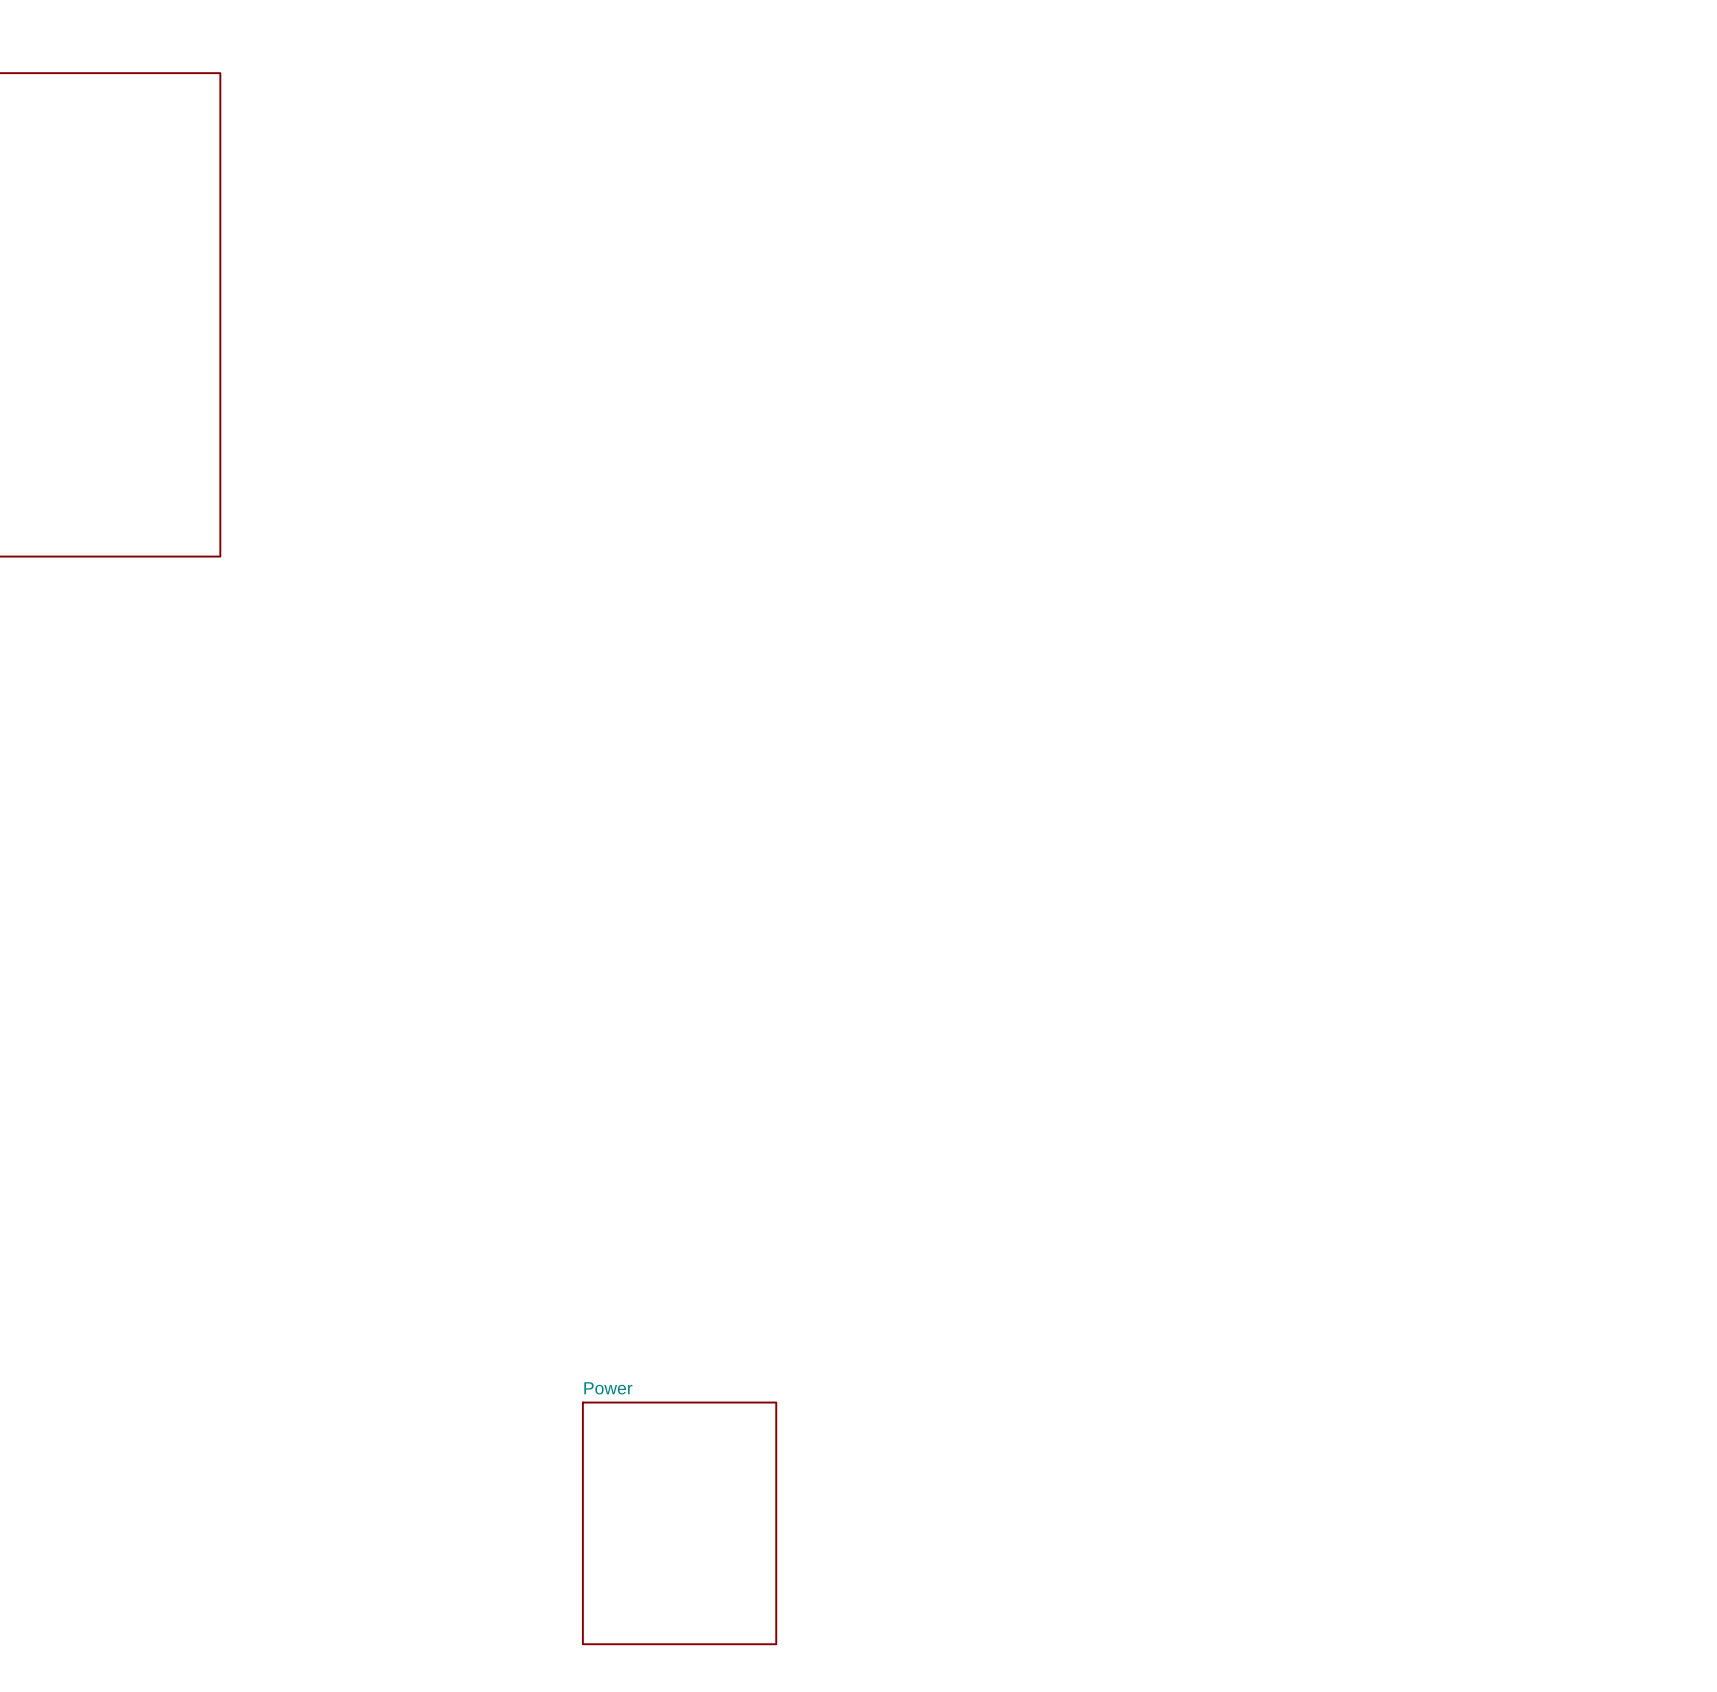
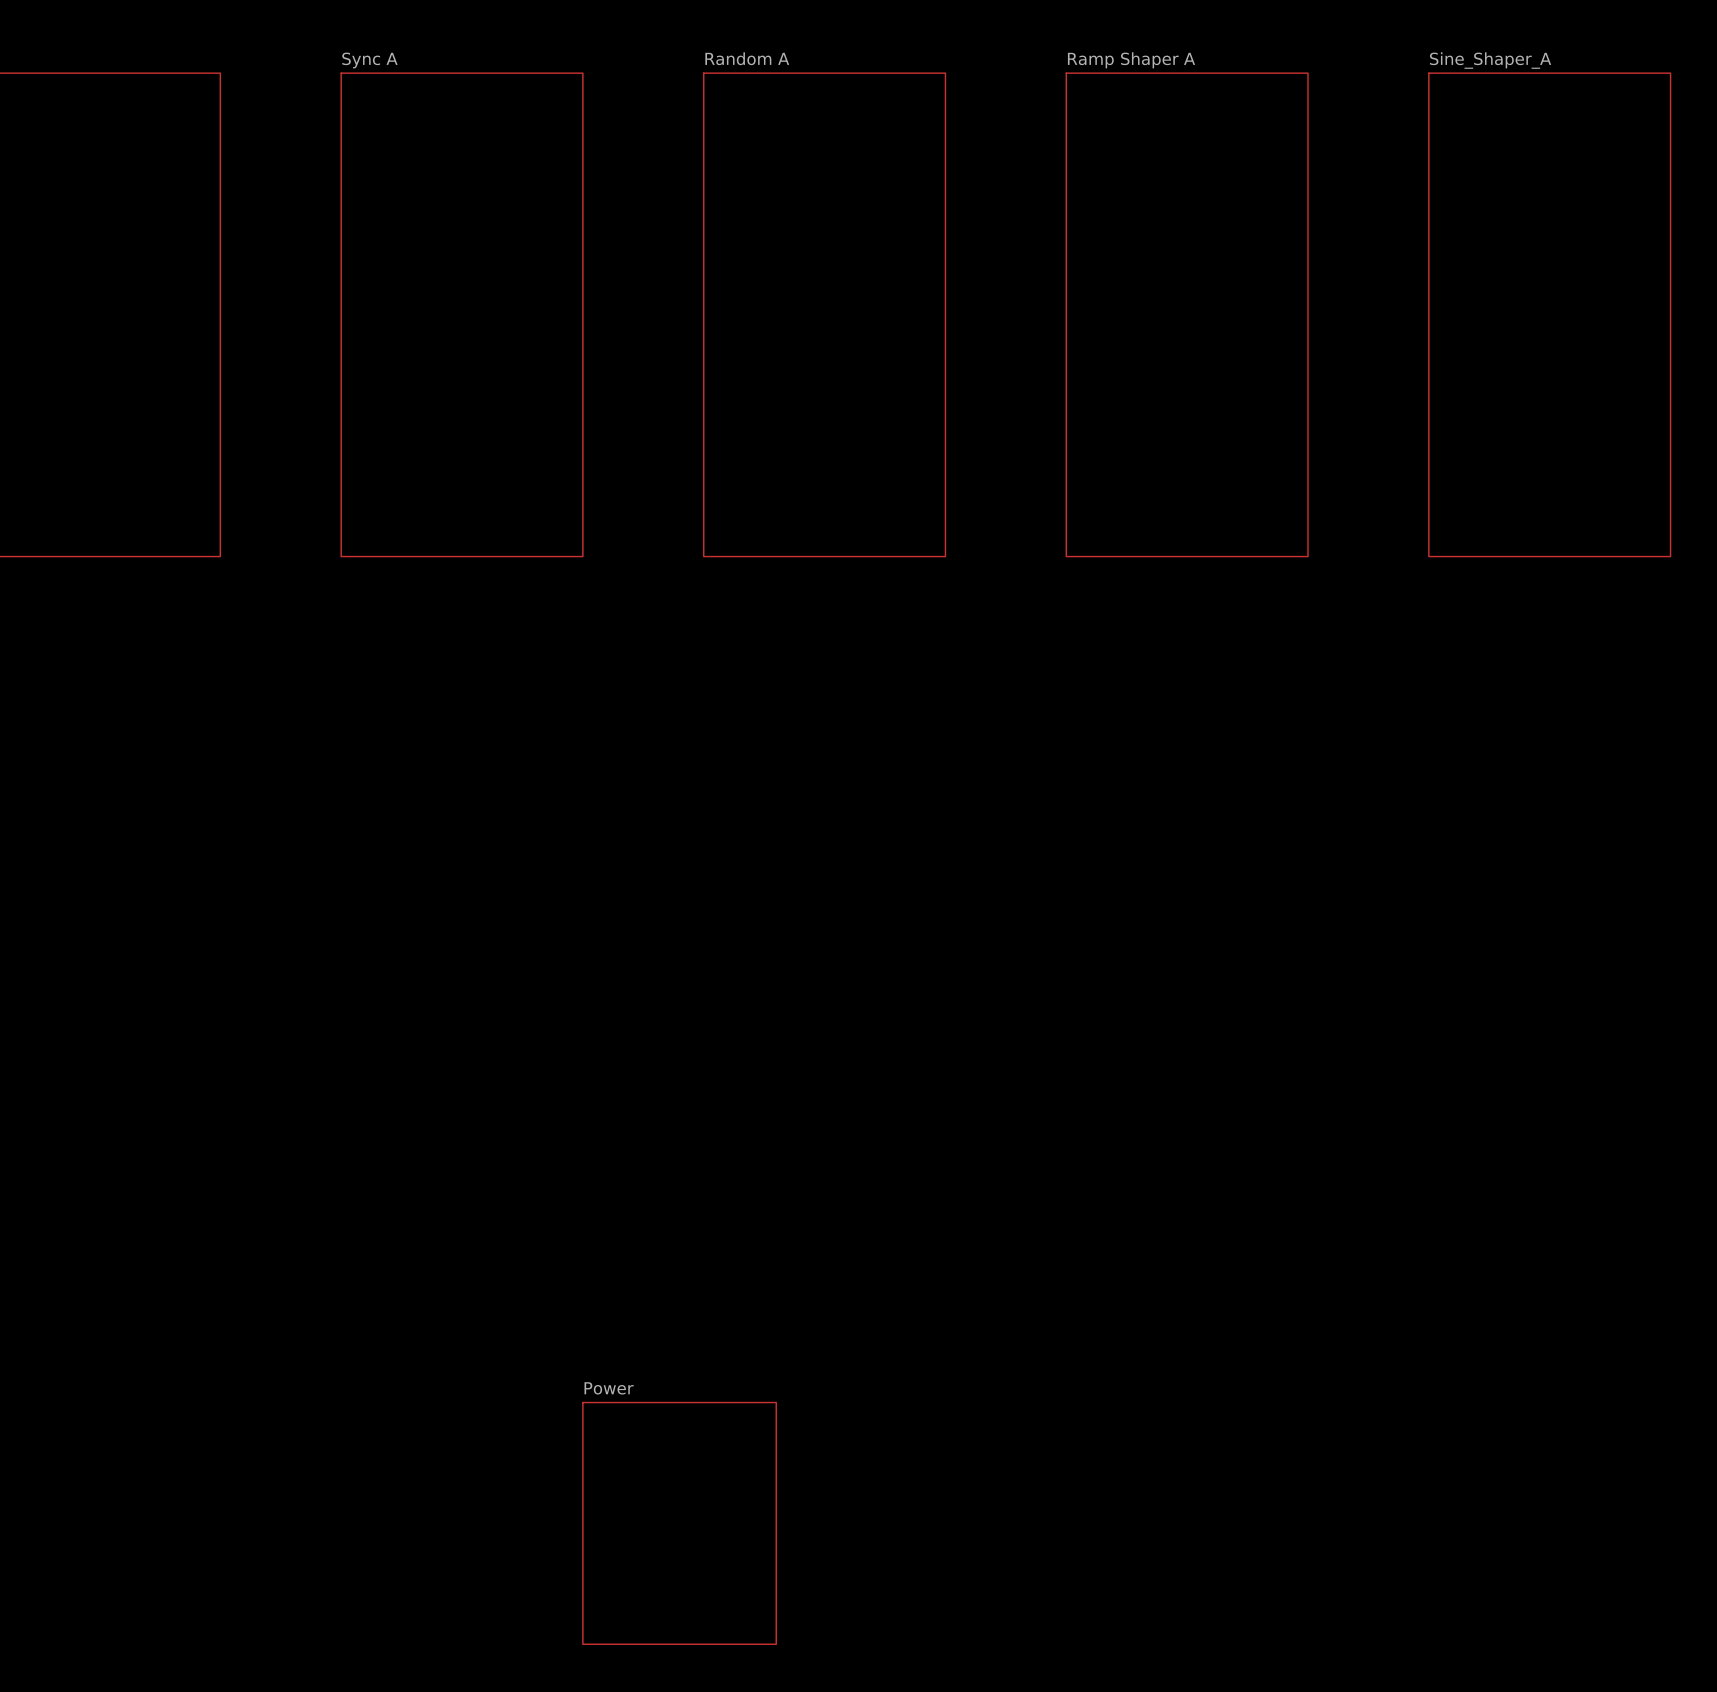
sheet Sync A: none -> (462, 314)
sheet Random A: none -> (824, 314)
sheet Ramp Shaper A: none -> (1187, 314)
sheet Sine_Shaper_A: none -> (1549, 314)

